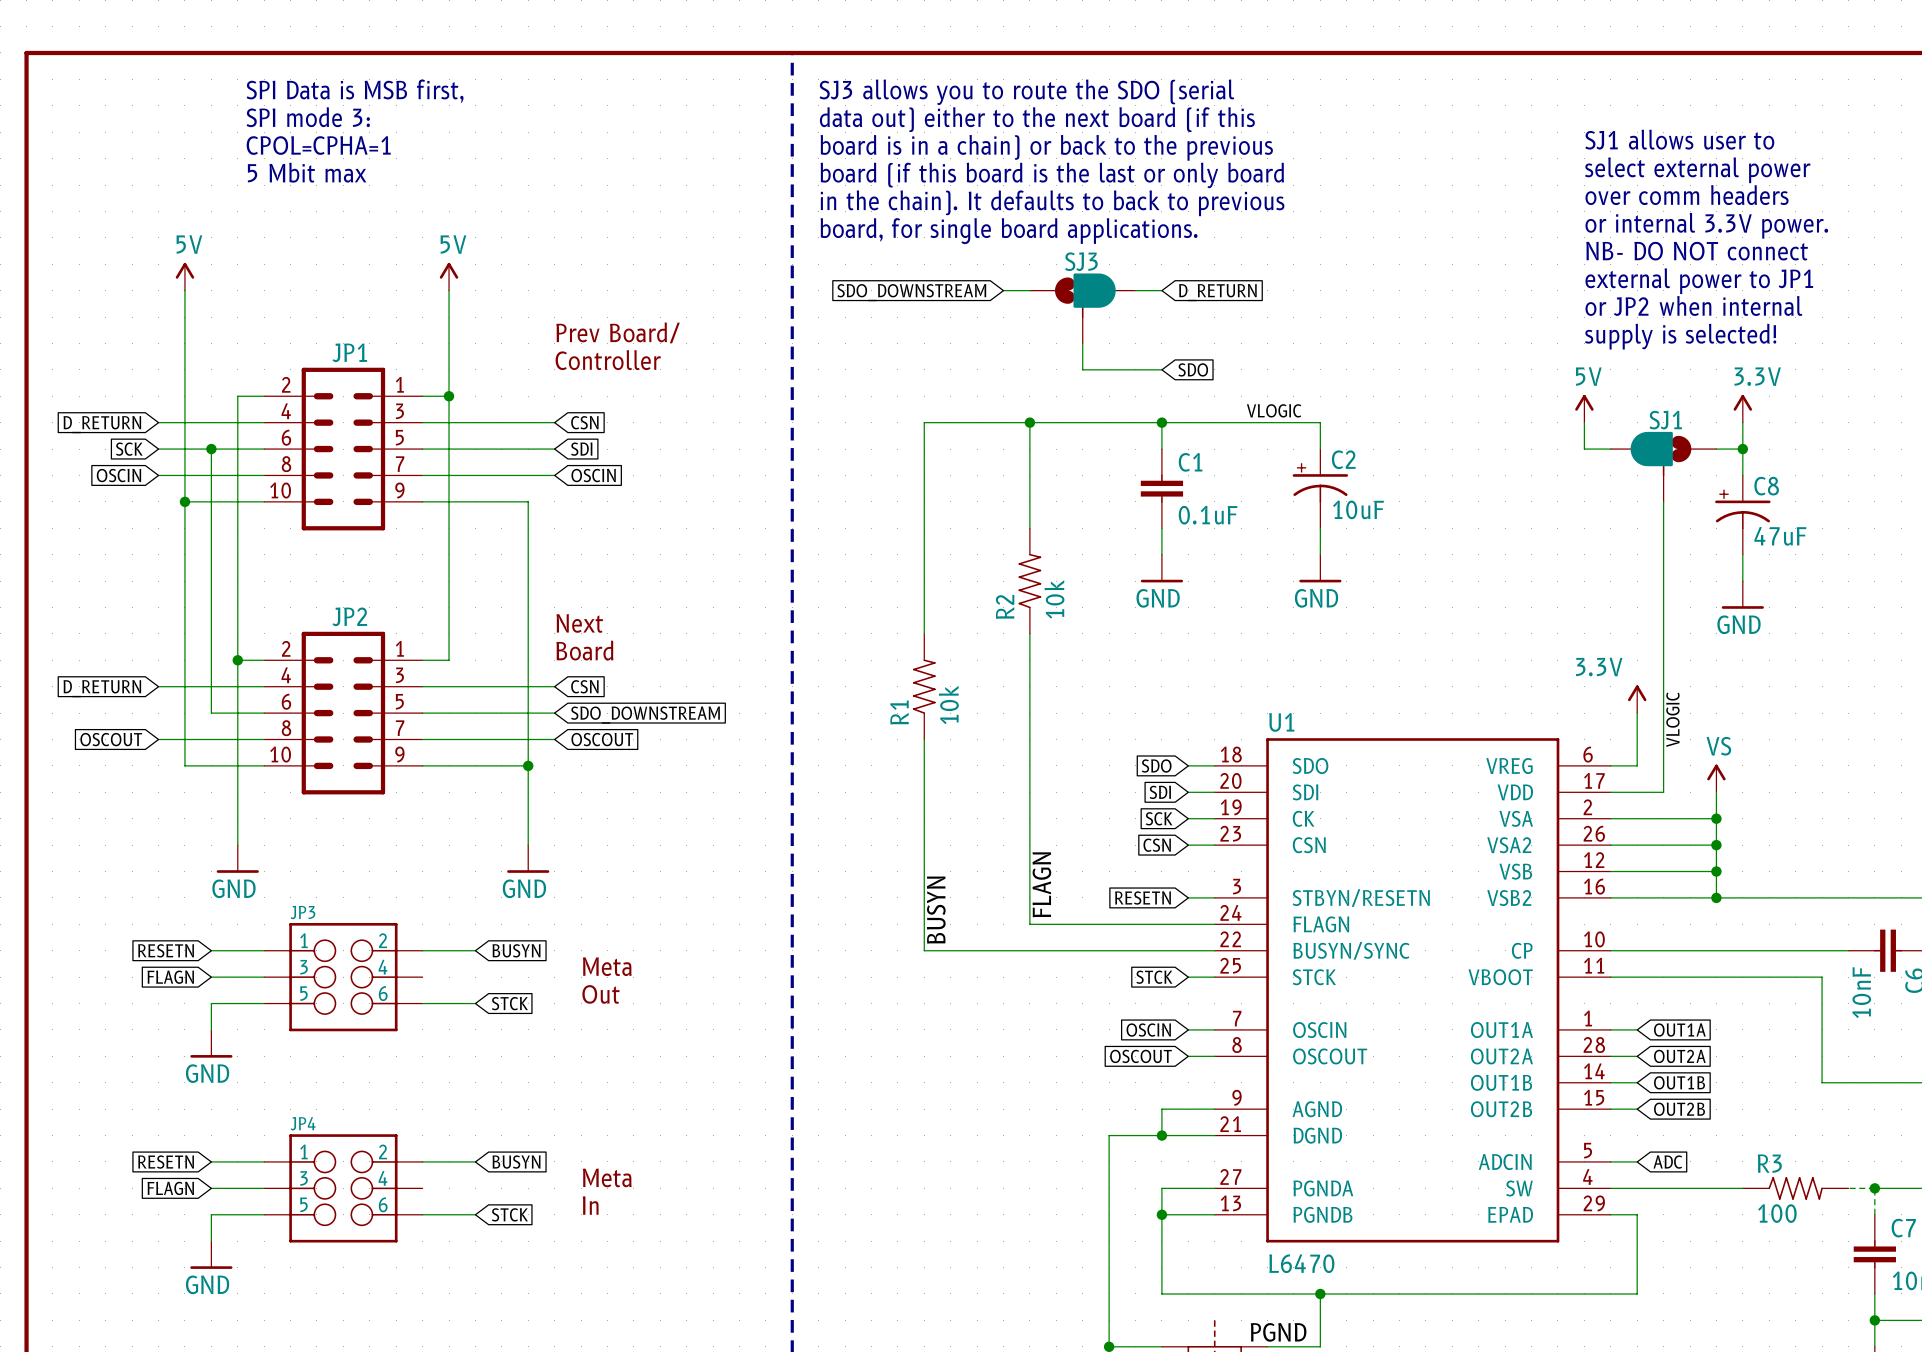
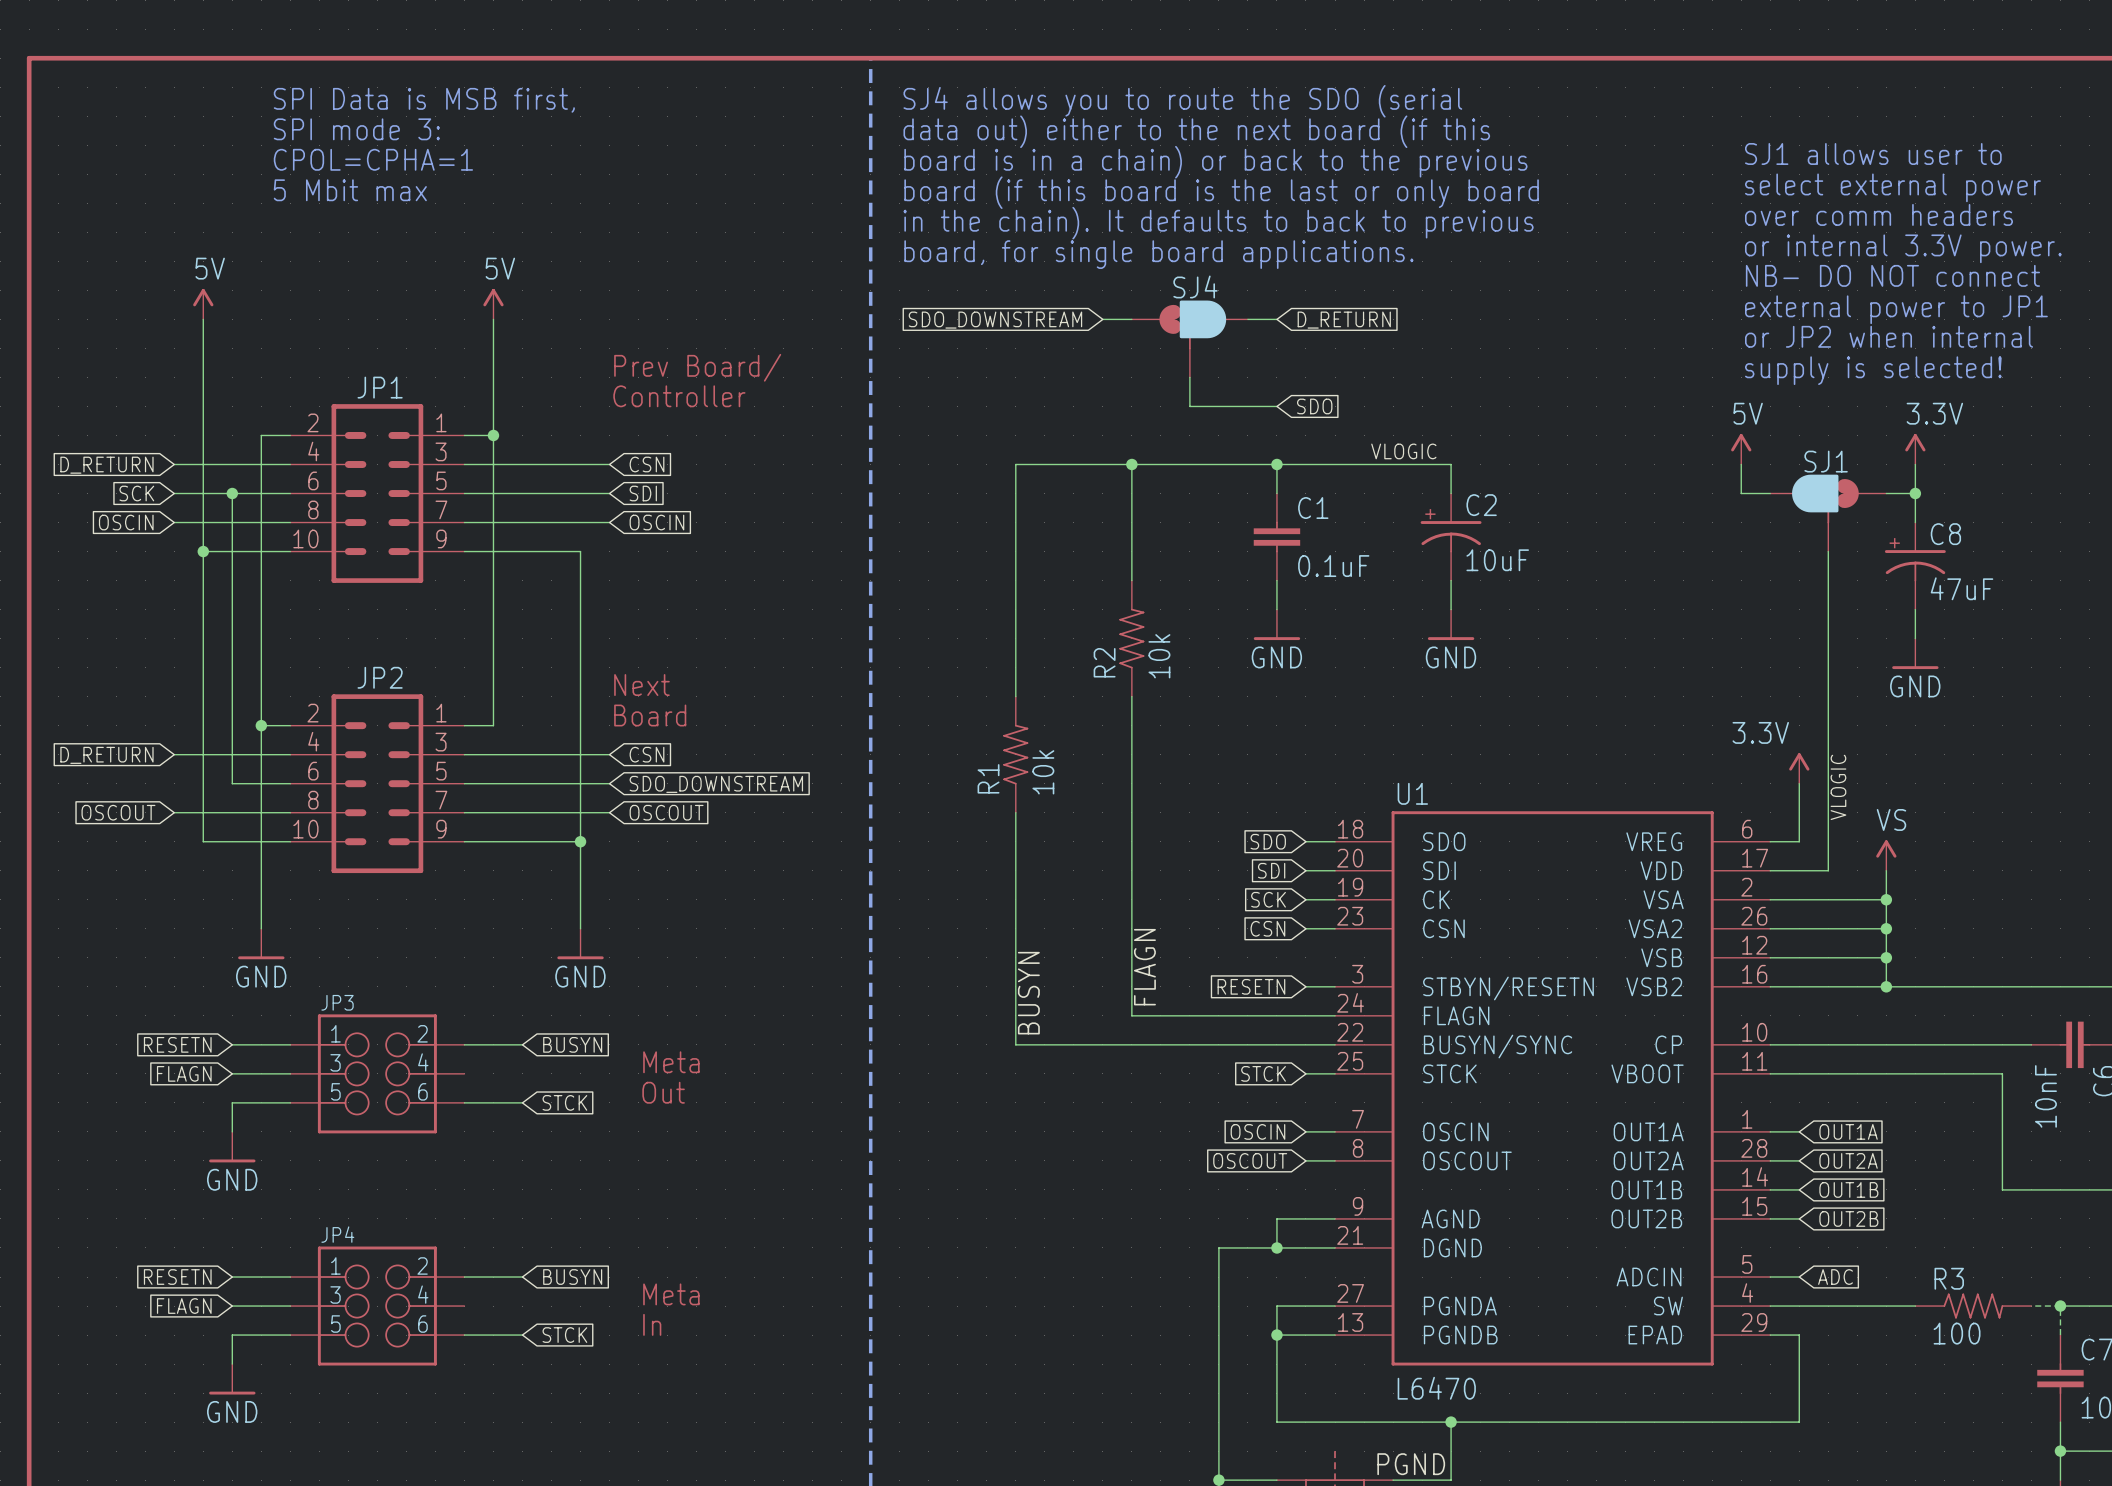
text: SJ3 allows you to route the SDO (serial (1026, 92) -> SJ4 allows you to route the SDO (serial (1182, 101)
SJ3 name: SJ3 (1081, 261) -> SJ4 (1195, 287)

